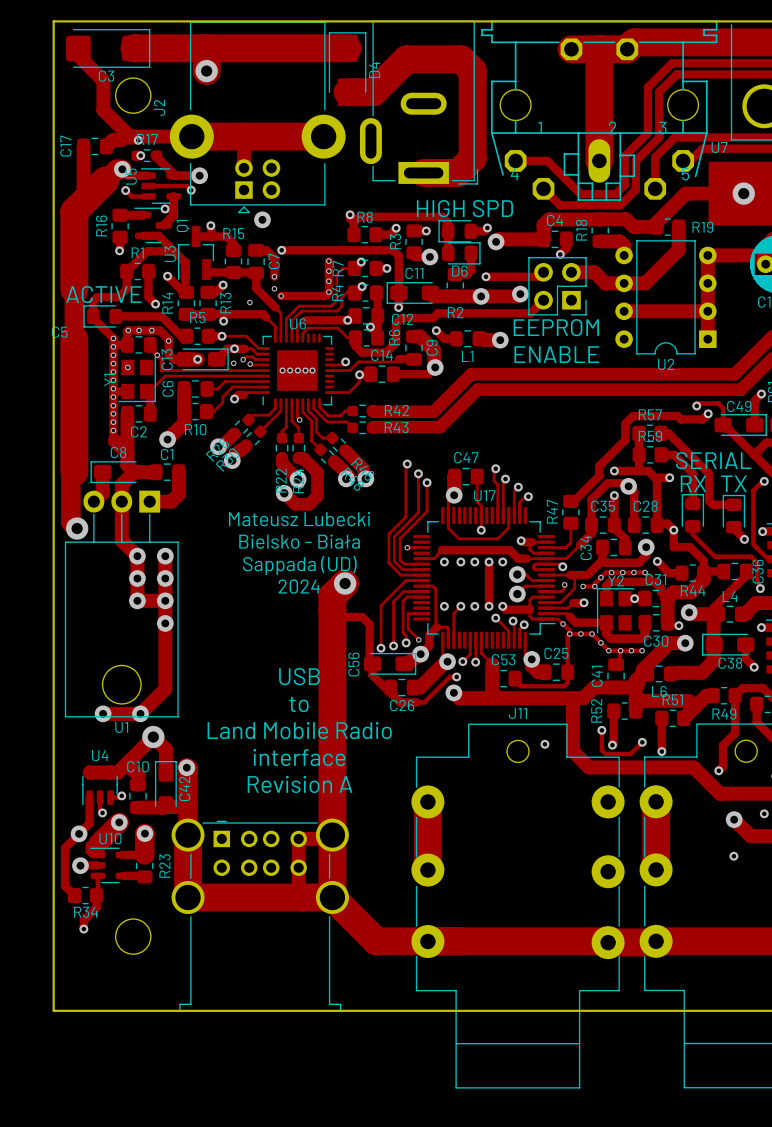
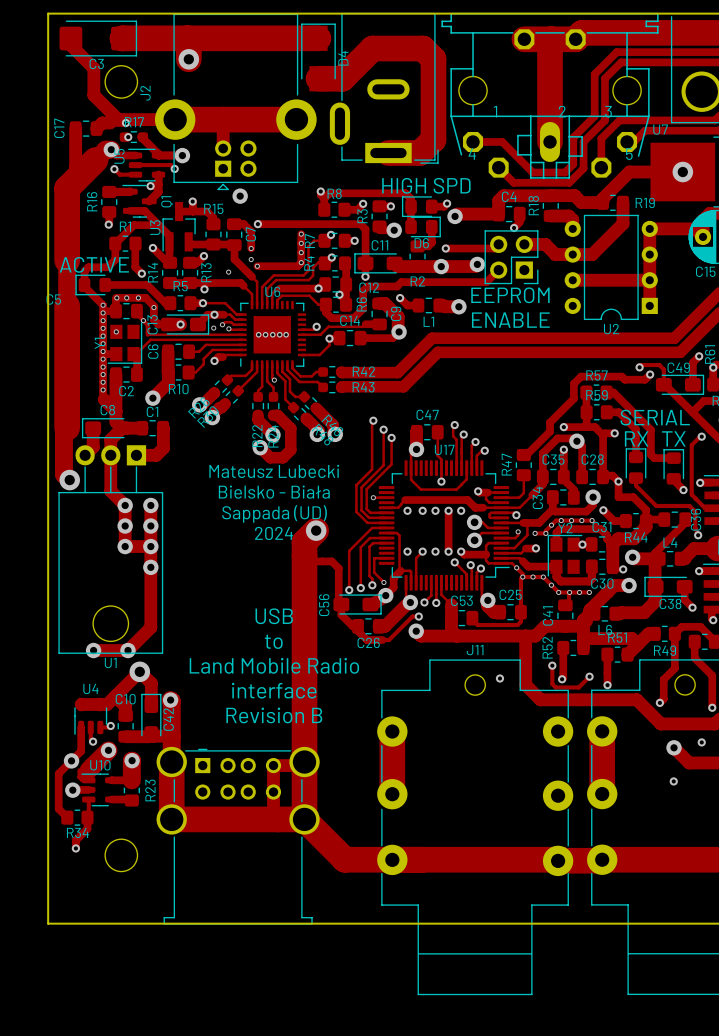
text: Revision A (300, 784) -> Revision B (274, 715)

